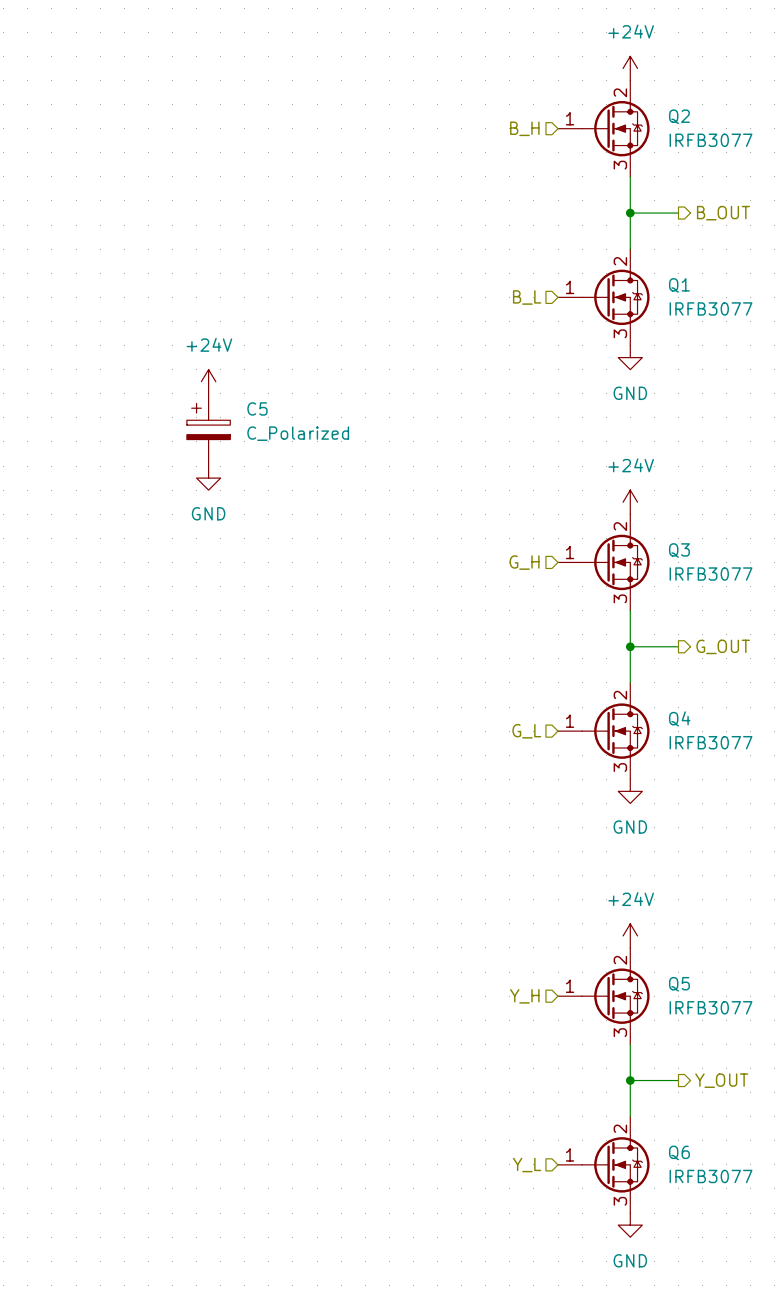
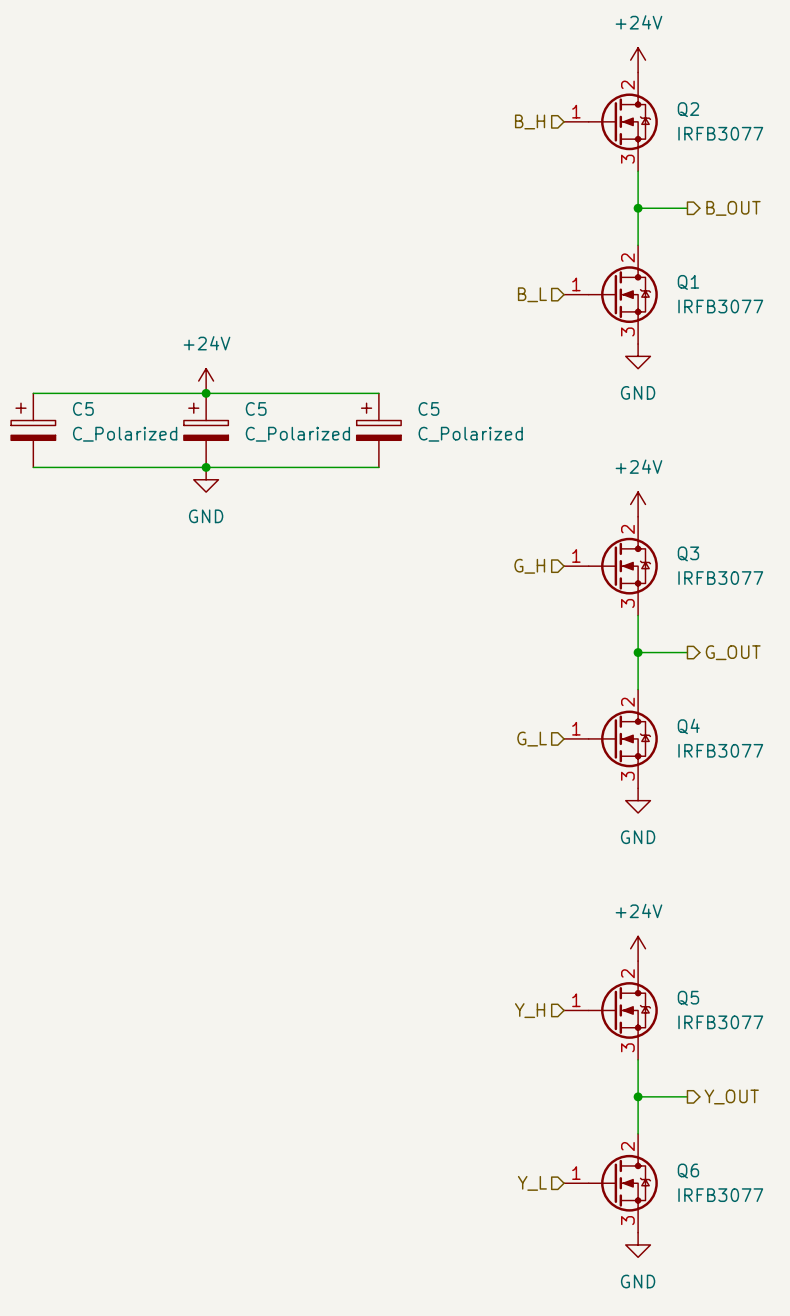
wire: none -> (33, 393) (378, 393)
junction: none -> (206, 393)
C5: none -> C_Polarized (33, 430)
C5: none -> C_Polarized (378, 430)
wire: none -> (33, 467) (378, 467)
junction: none -> (206, 467)

